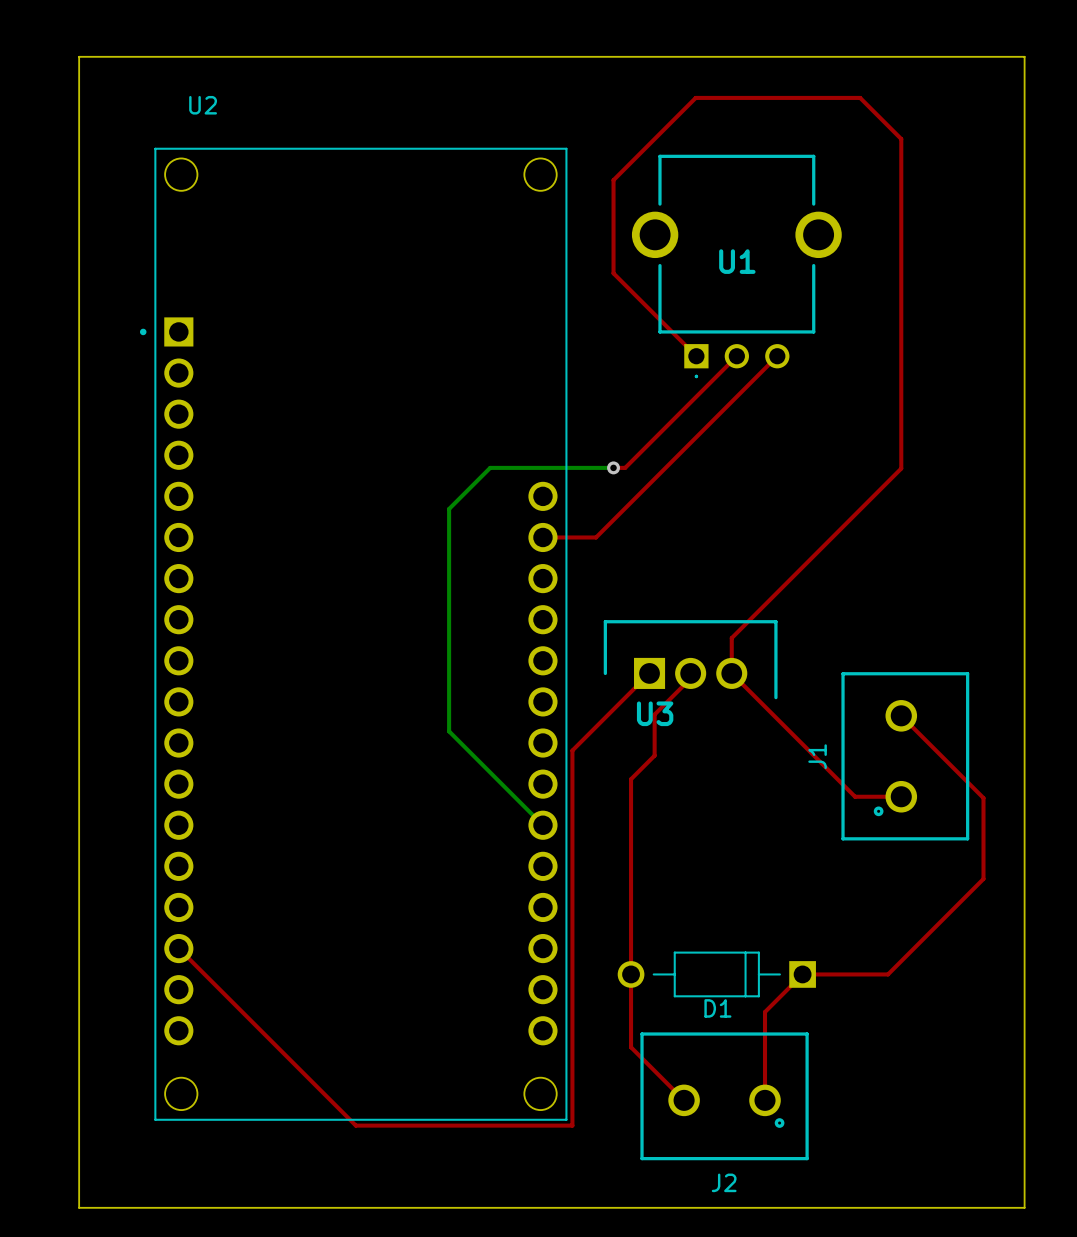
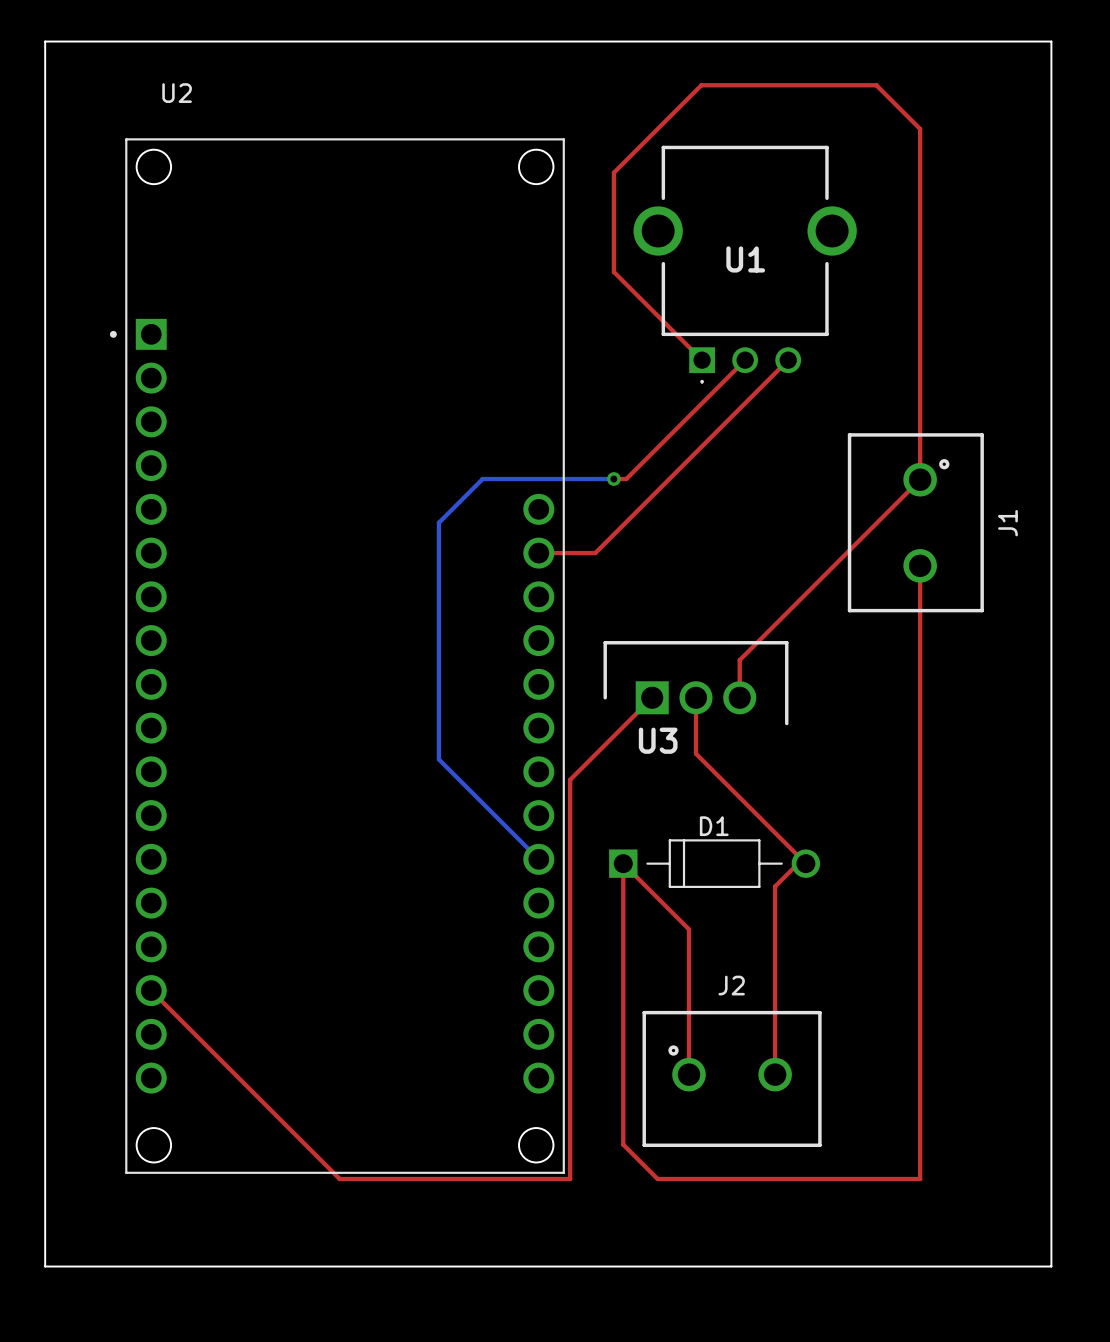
top track: none -> (920, 565) (920, 1179) (657, 1179) (623, 1144) (623, 863) (689, 929) (689, 1074)
top track: (731, 673) (855, 796) (901, 796) -> none
top track: (690, 678) (654, 714) (654, 755) (631, 779) (631, 1047) (684, 1100) -> (695, 703) (695, 753) (805, 863) (798, 863) (775, 886) (775, 1058)
top track: (901, 715) (983, 798) (983, 878) (888, 974) (802, 974) (765, 1012) -> none
J1 rotation: 0° (905, 756) -> 180° (915, 522)
J1 position: (905, 756) -> (915, 522)
D1 rotation: 0° (716, 974) -> 180° (714, 863)
D1 position: (716, 974) -> (714, 863)
top track: (765, 1027) (765, 1100) -> none
J2 rotation: 0° (724, 1096) -> 180° (732, 1078)

